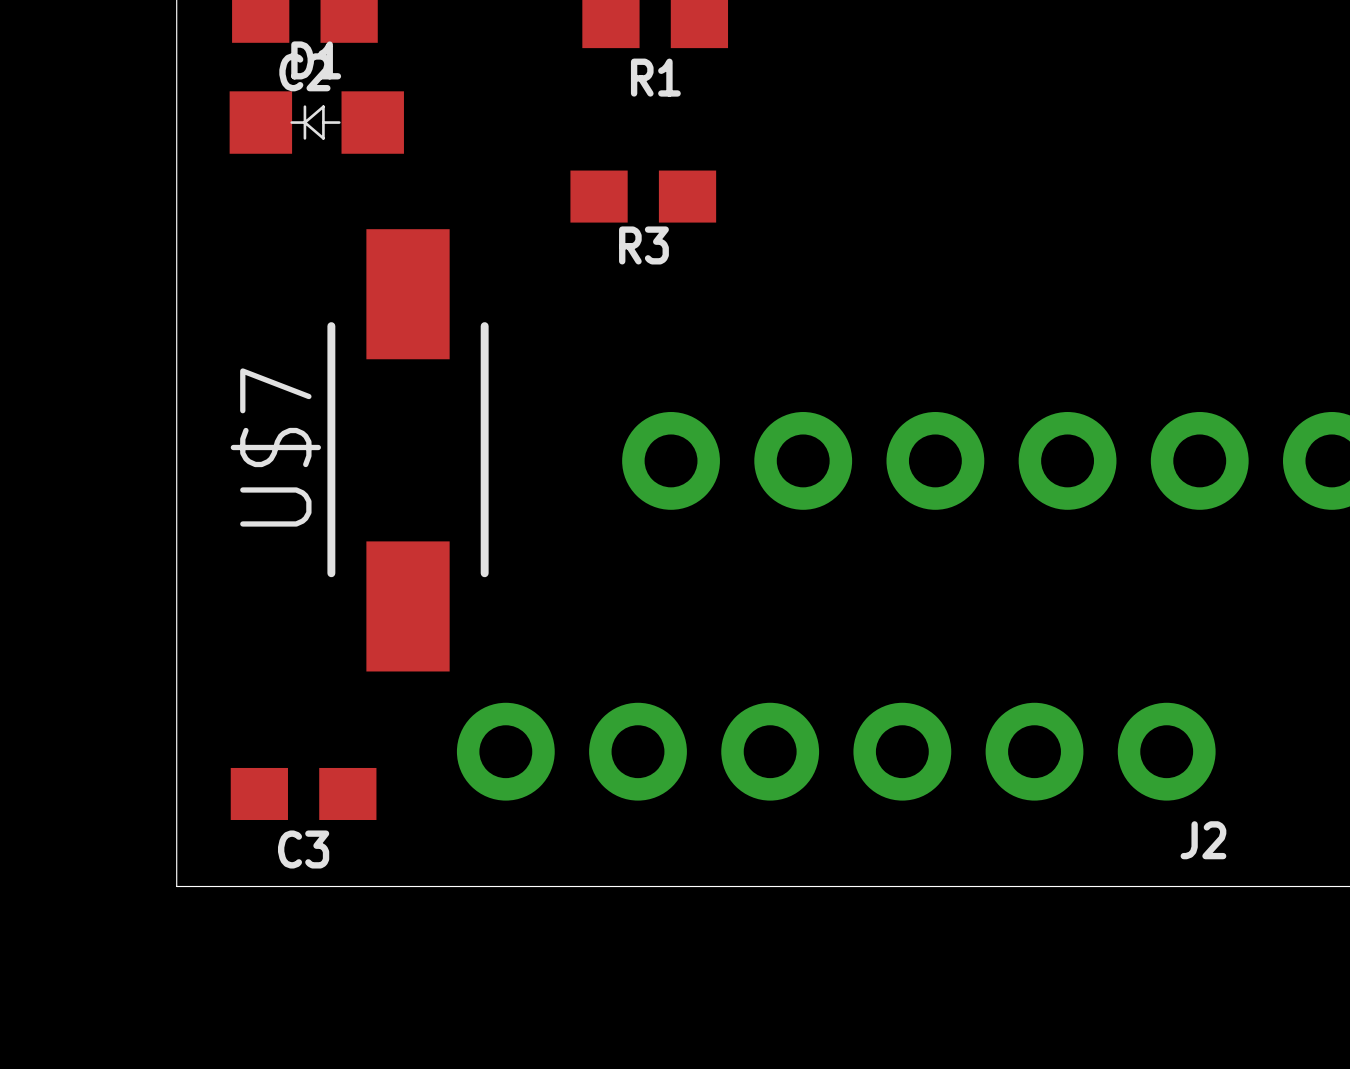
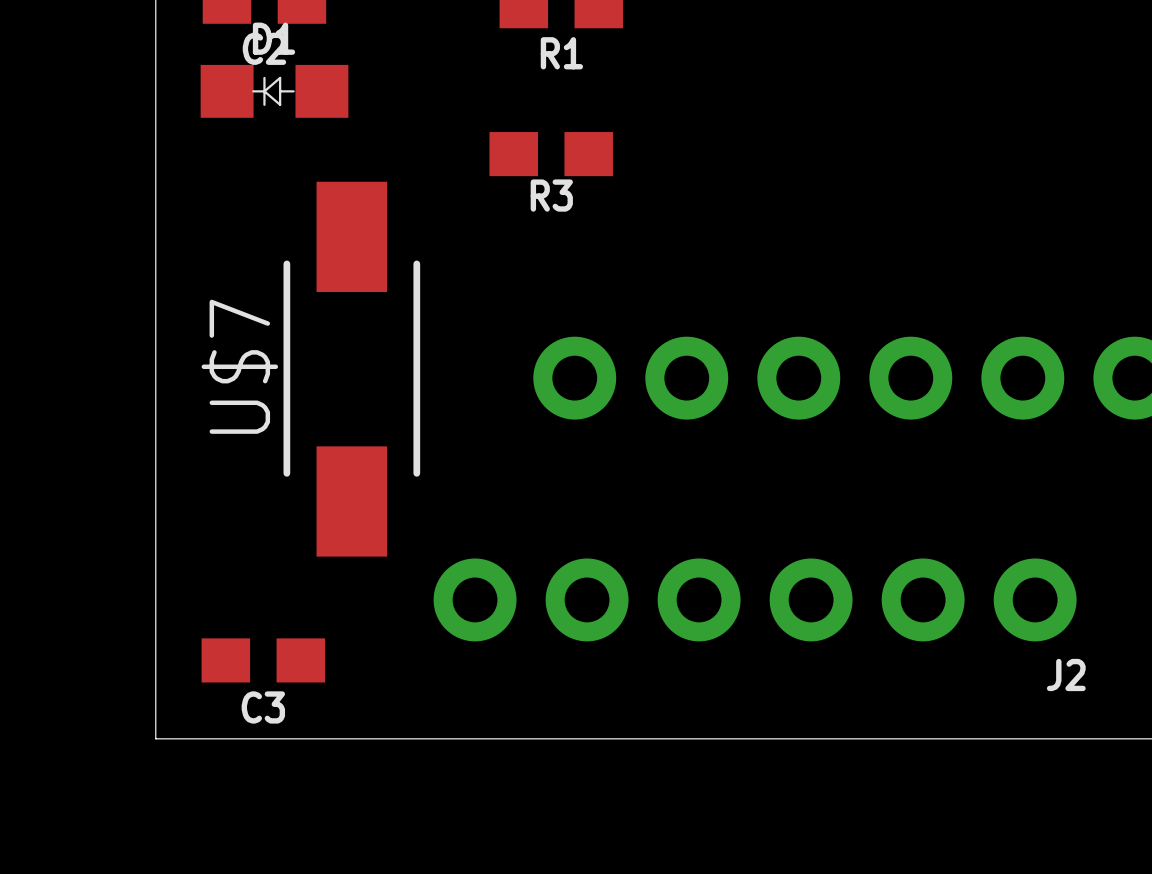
J2 position: (836, 751) -> (755, 599)

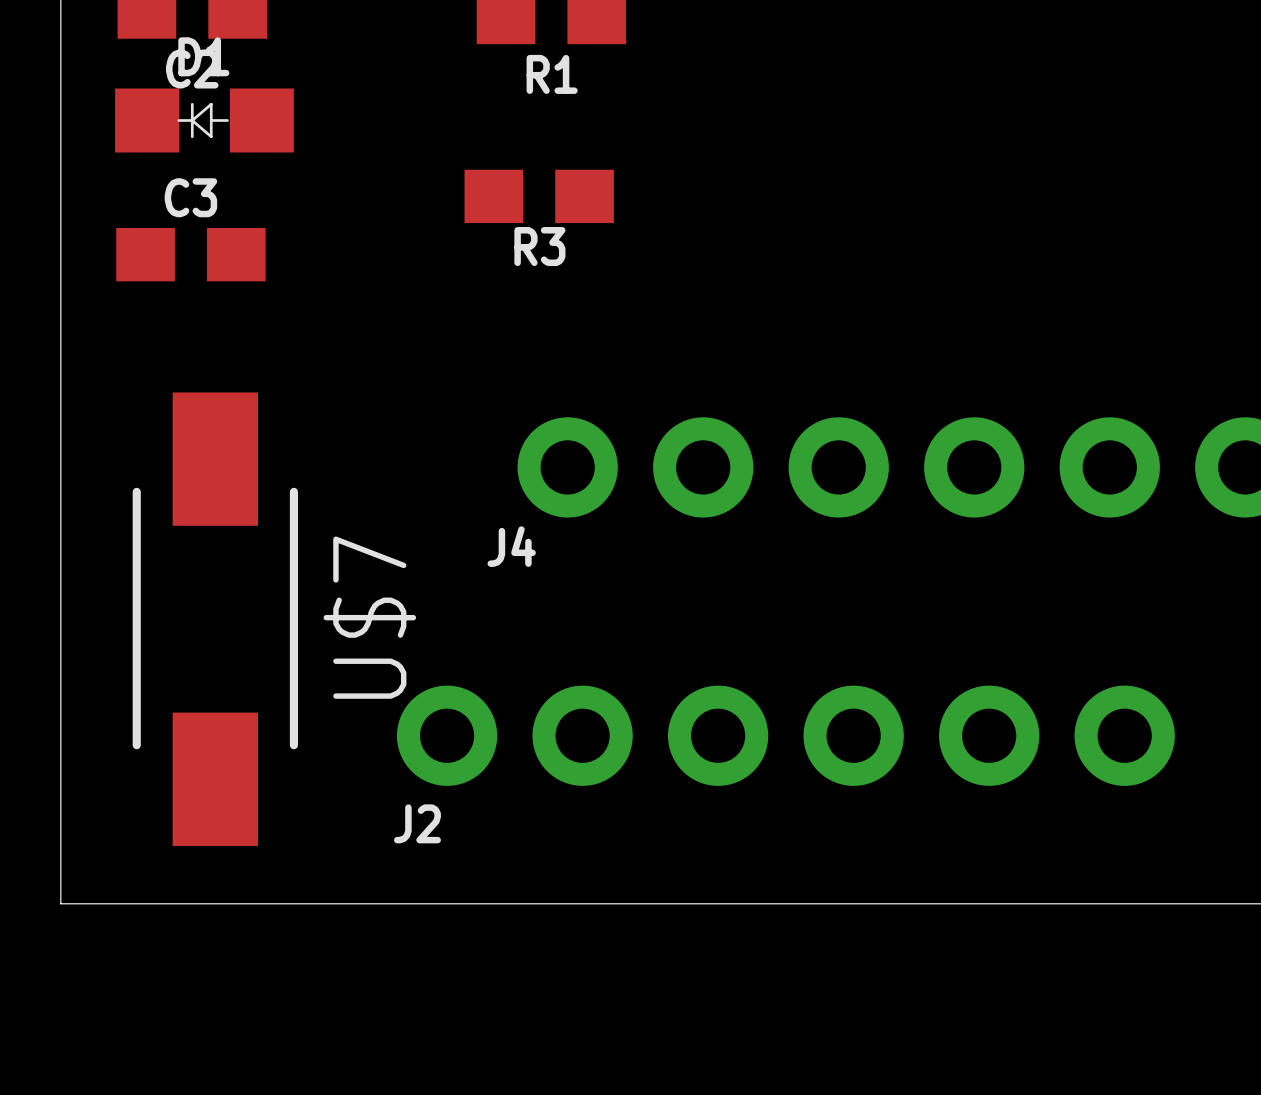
U$7 name position: U$7 (239, 366) -> U$7 (369, 617)
U$7 position: (351, 369) -> (215, 619)
J4 name: none -> J4 (511, 546)
C3 position: (263, 660) -> (190, 254)
J2 name position: J2 (1066, 674) -> J2 (417, 823)
C3 name position: C3 (263, 707) -> C3 (190, 197)

